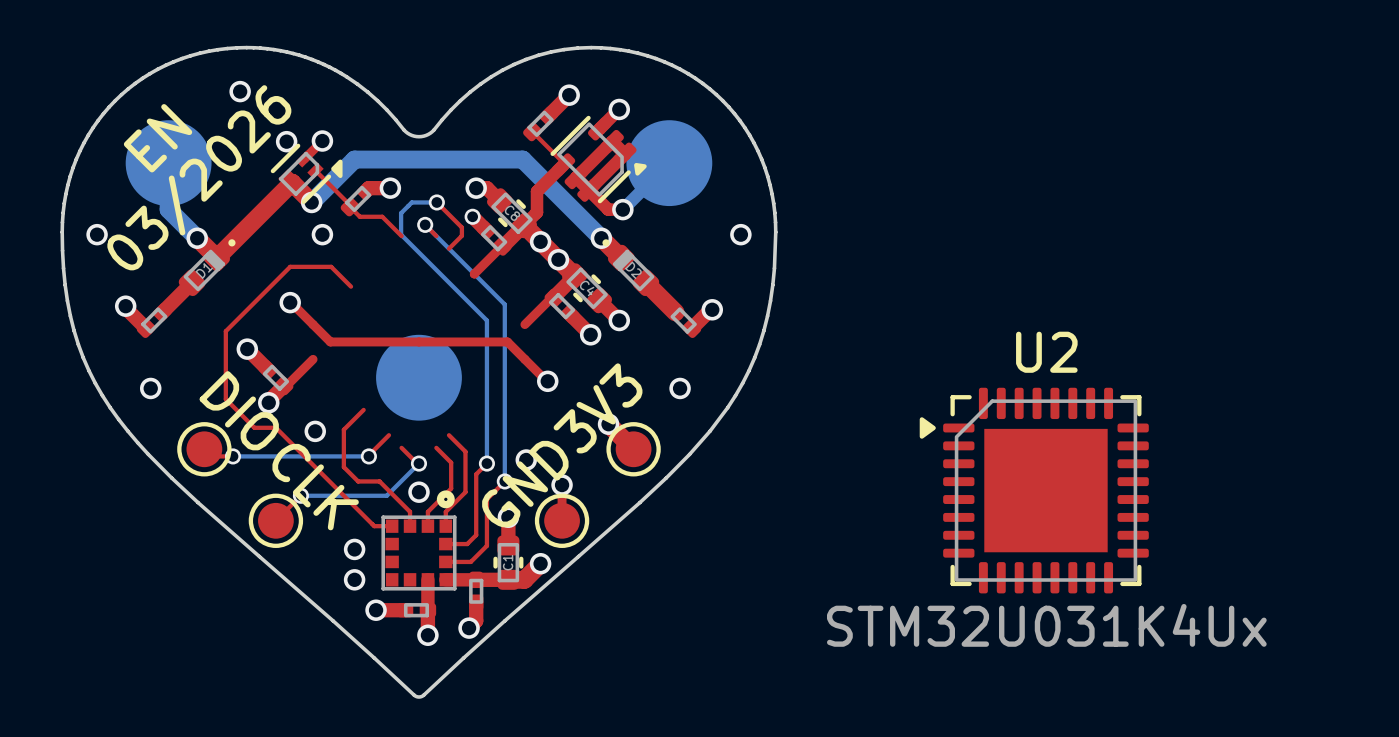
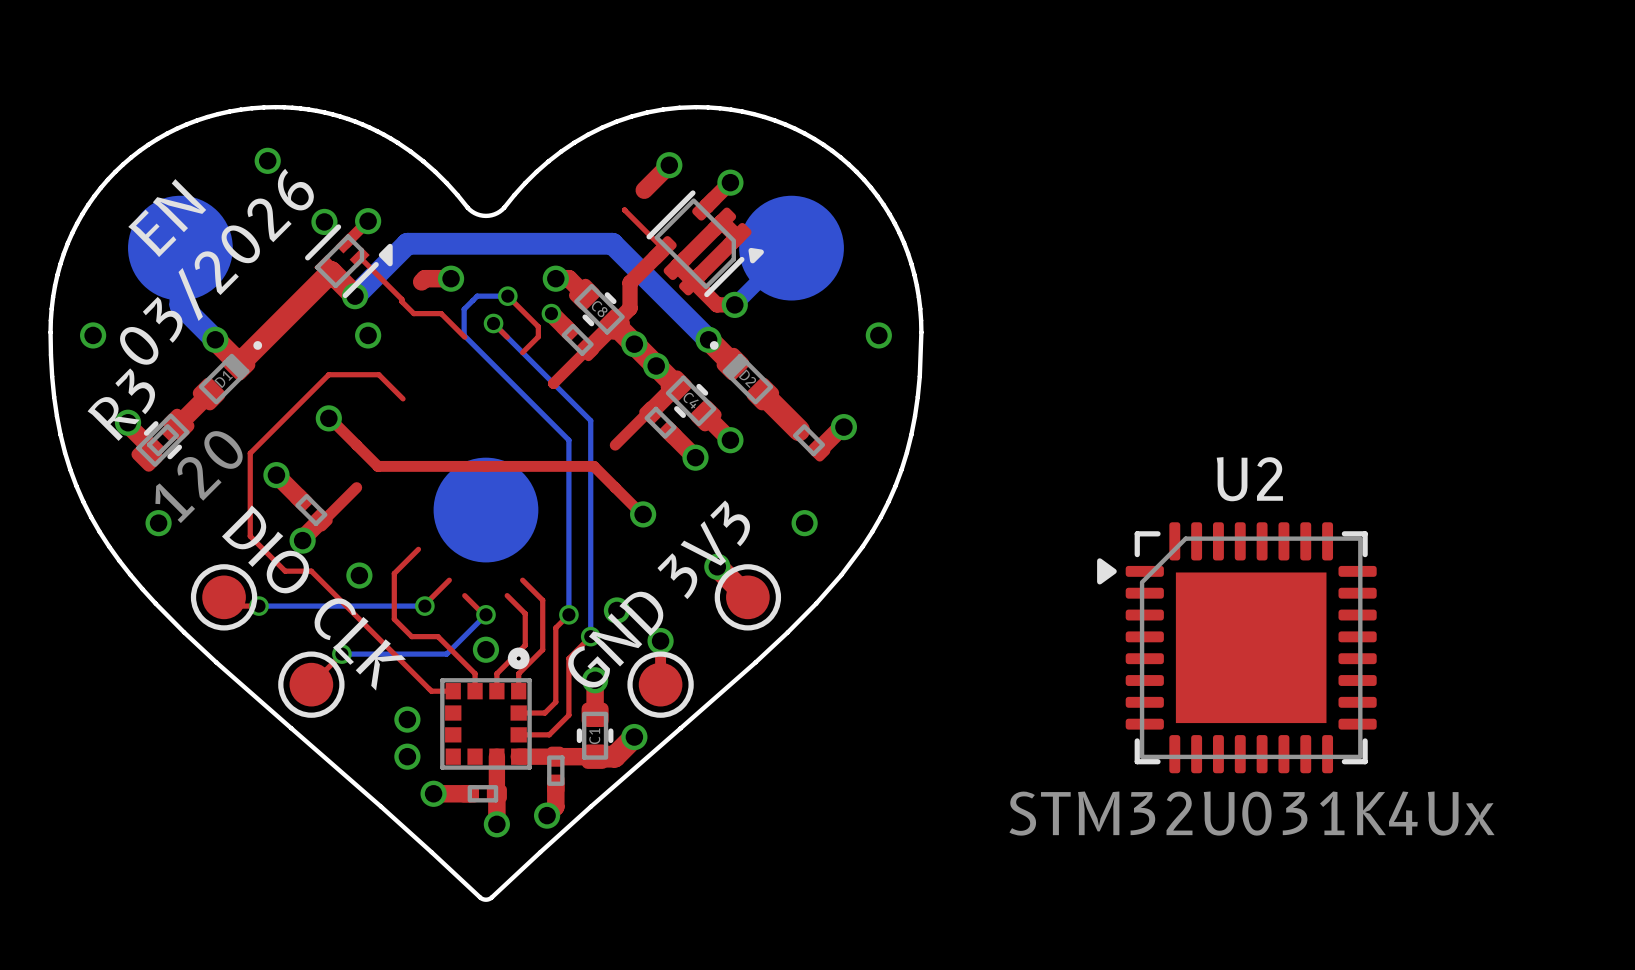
part: (540, 123) -> none
part: (358, 198) -> none
R3: none -> 120 (162, 440)

